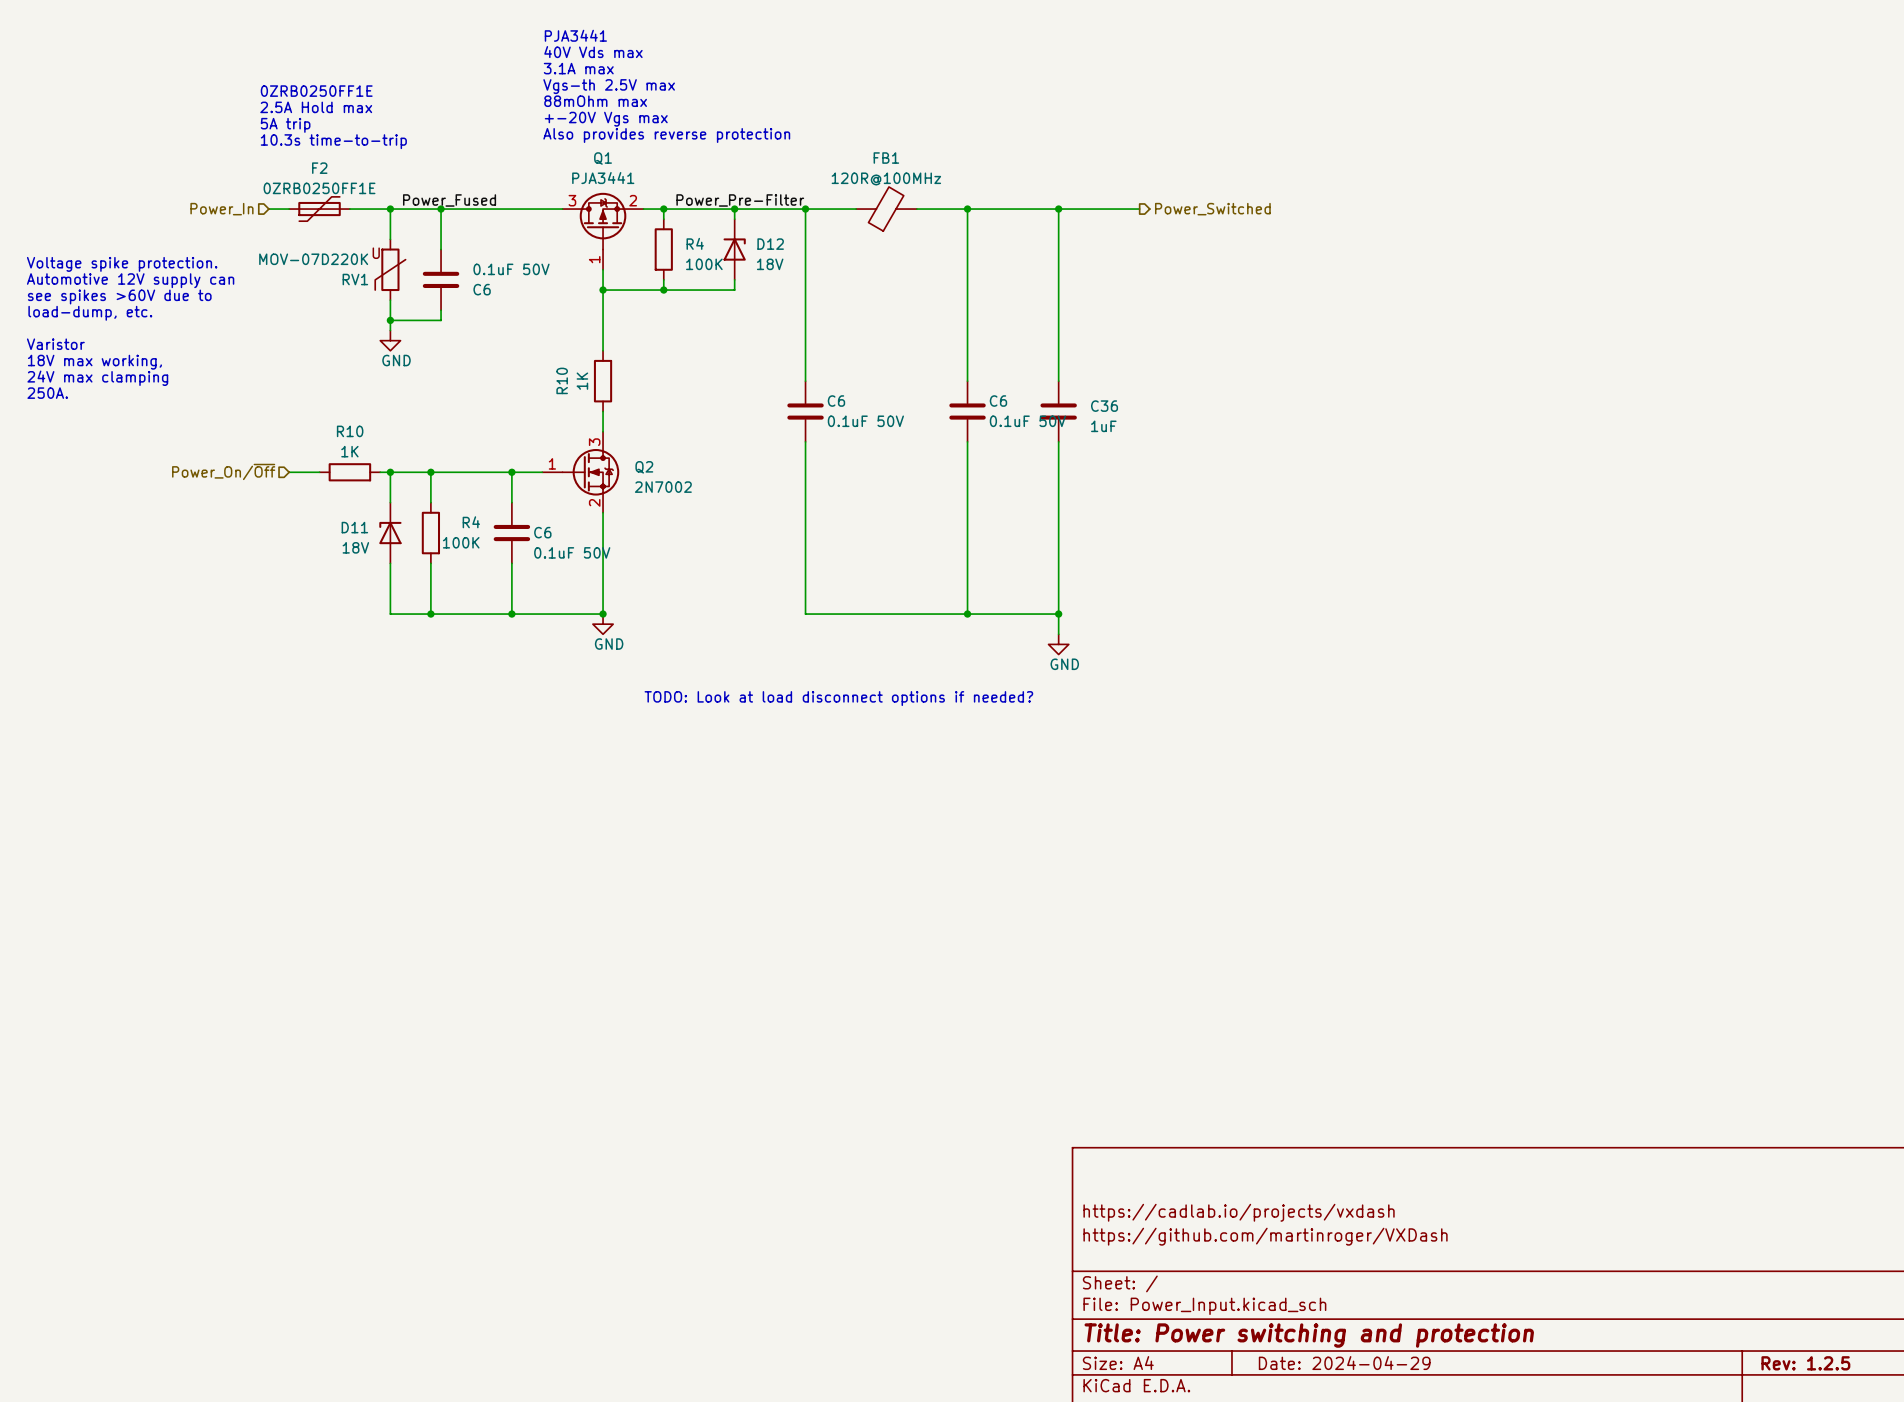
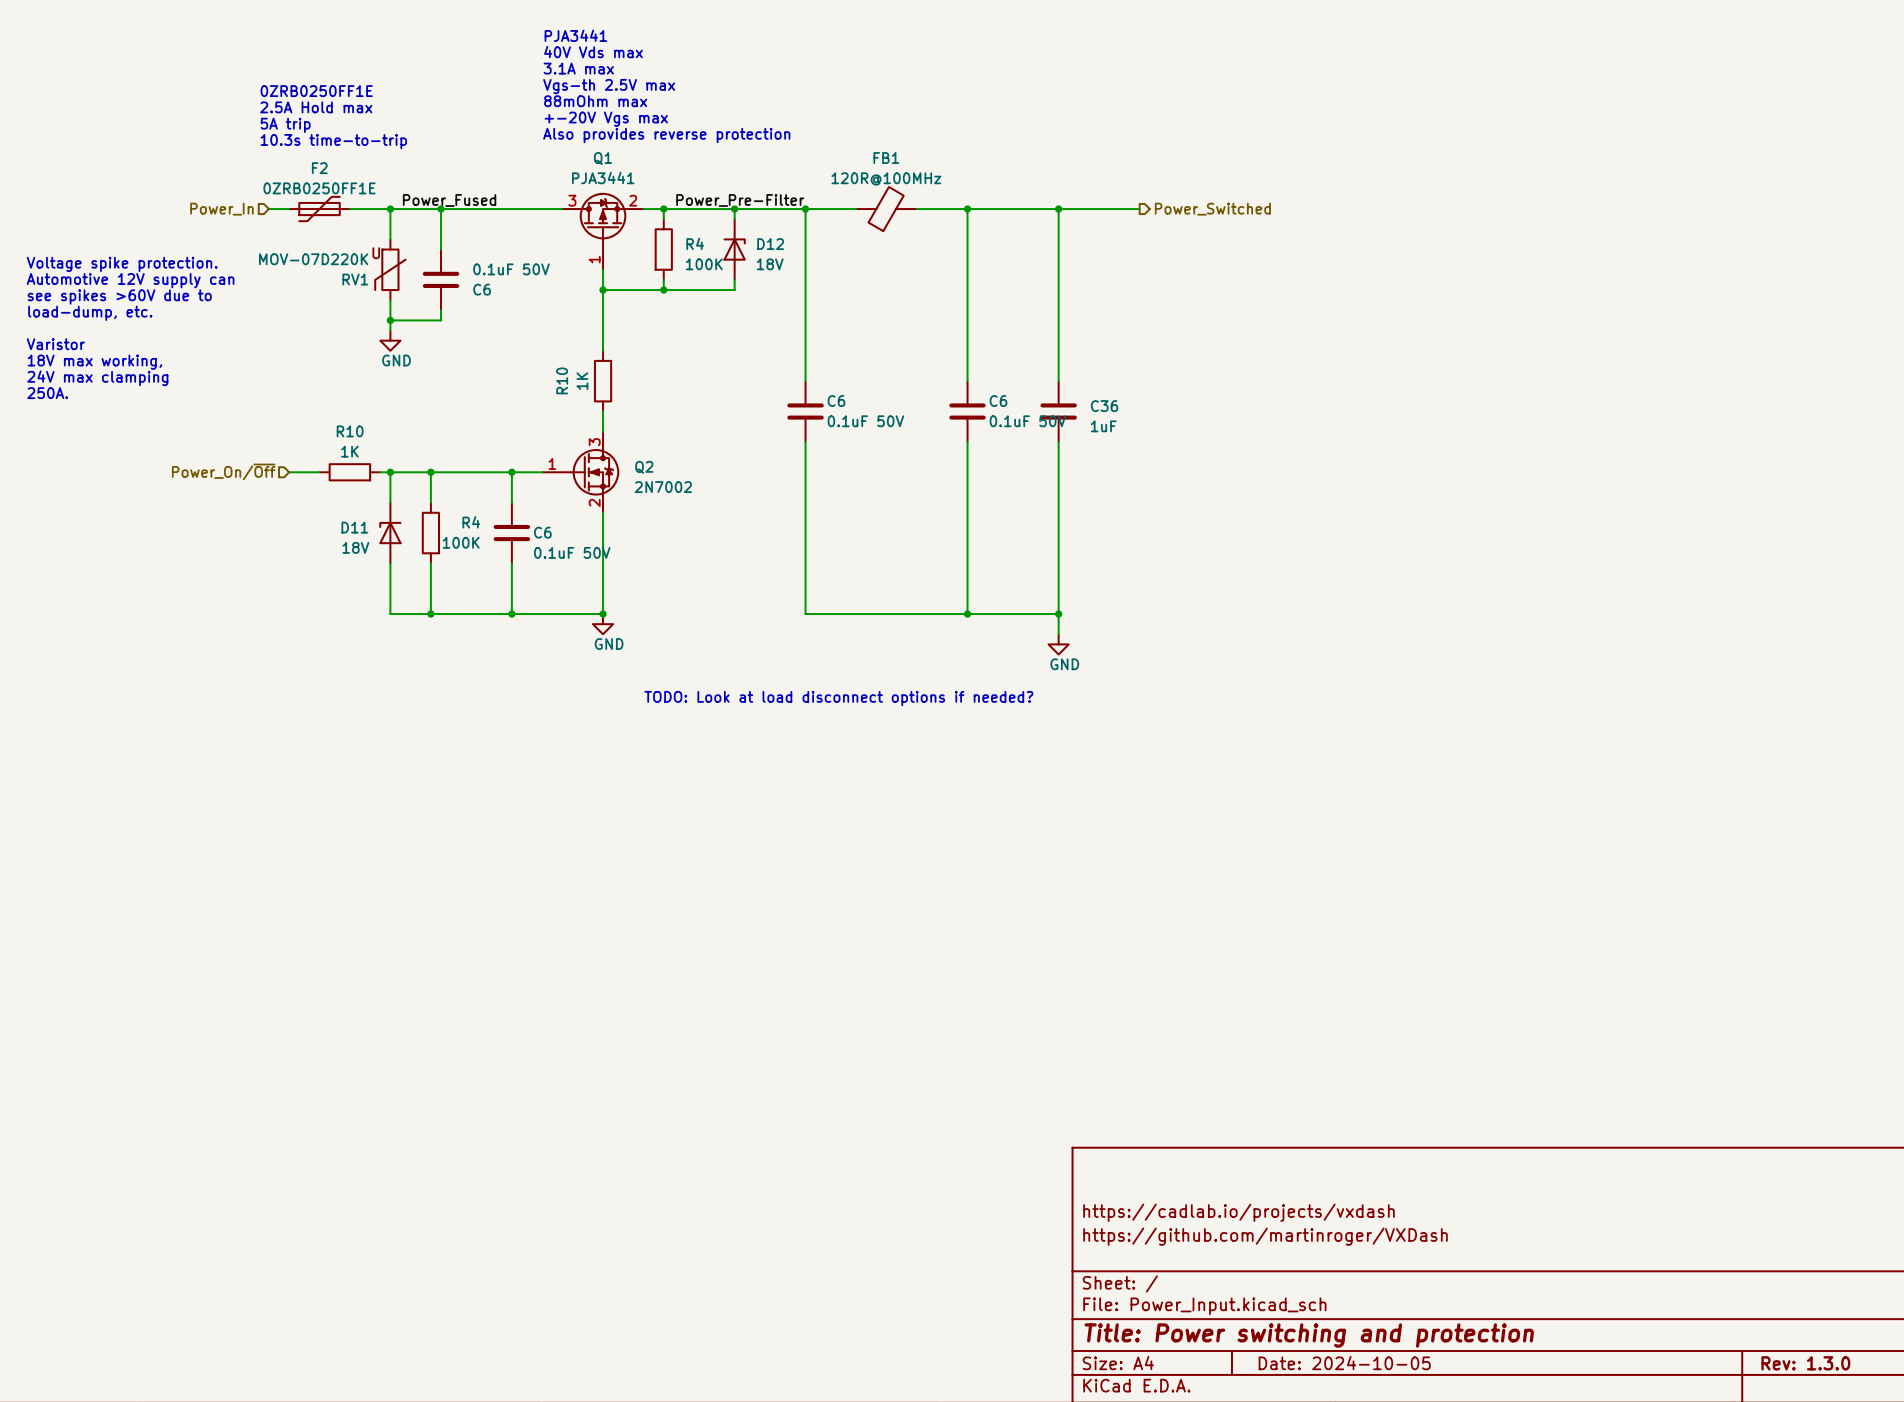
title block: Date: 2024-04-29 (1344, 1363) -> Date: 2024-10-05 (1344, 1363)
title block: Rev: 1.2.5 (1805, 1363) -> Rev: 1.3.0 (1805, 1363)

